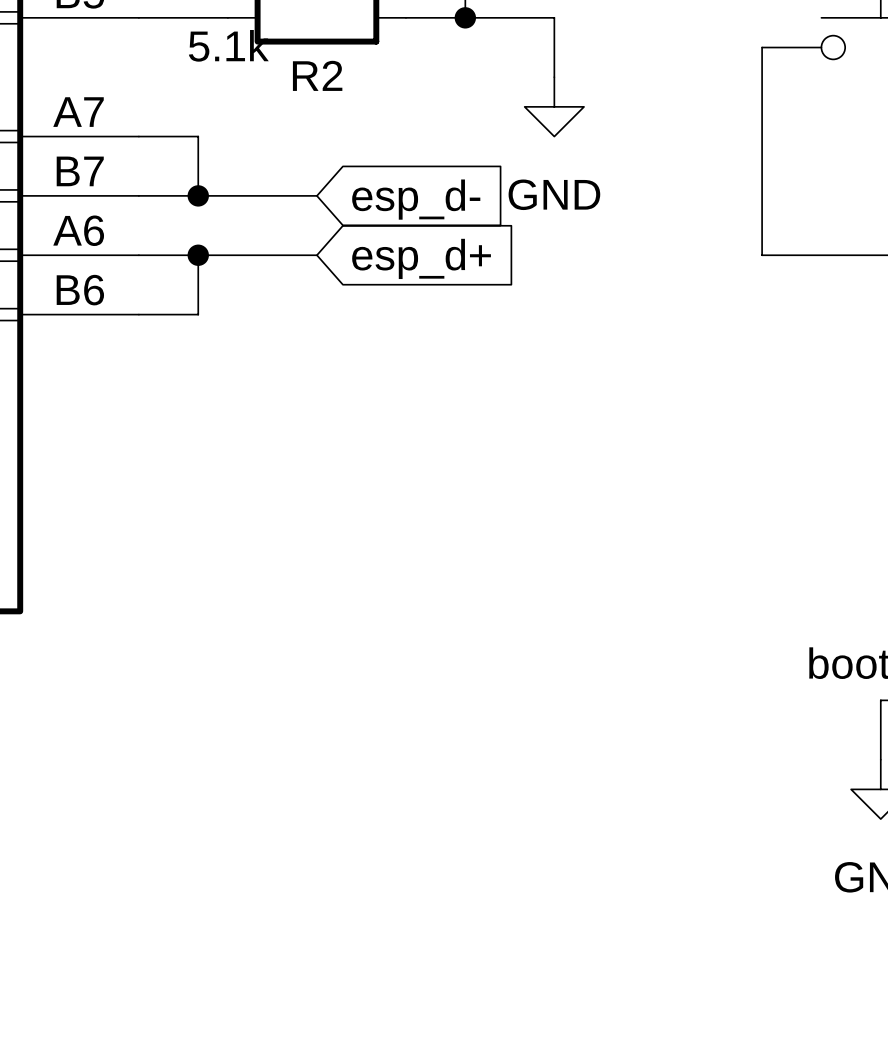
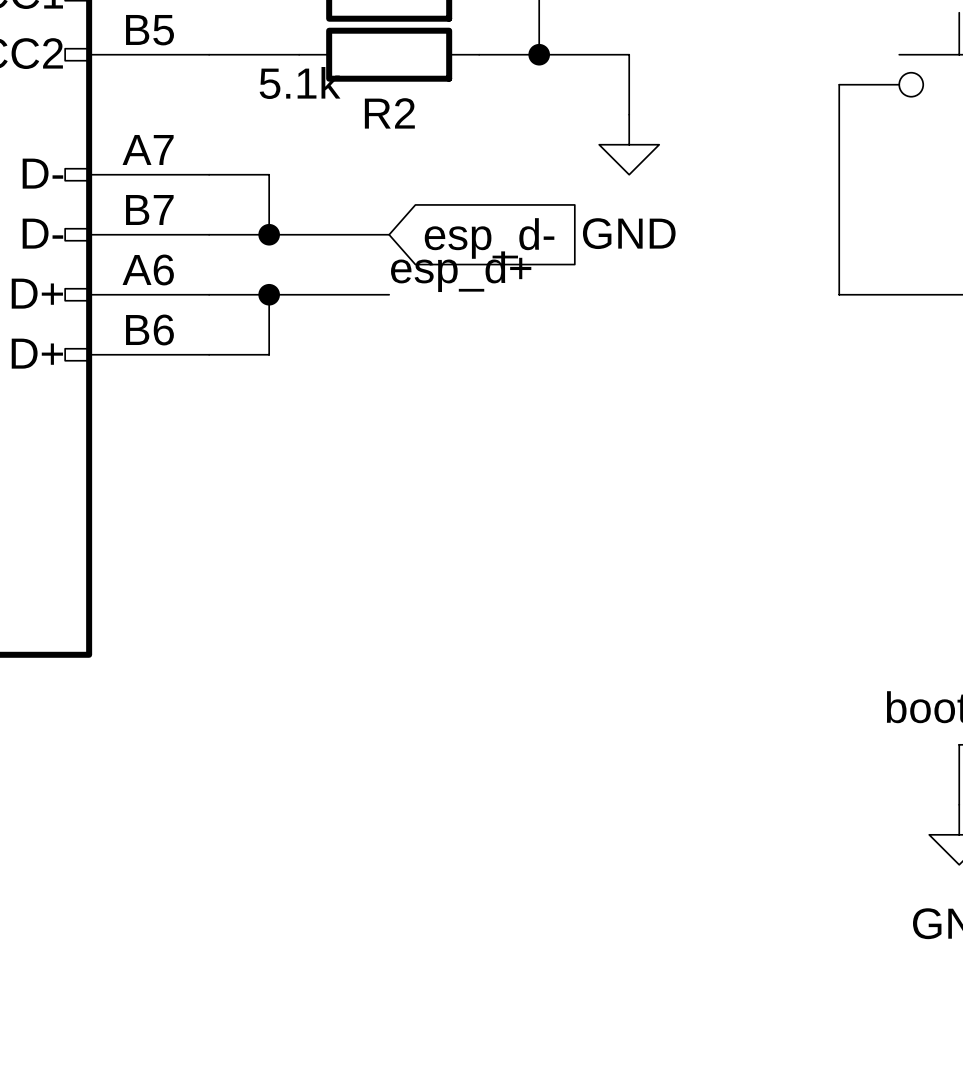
label: none -> esp_d+ (461, 271)
global label: esp_d+ (421, 258) -> none

